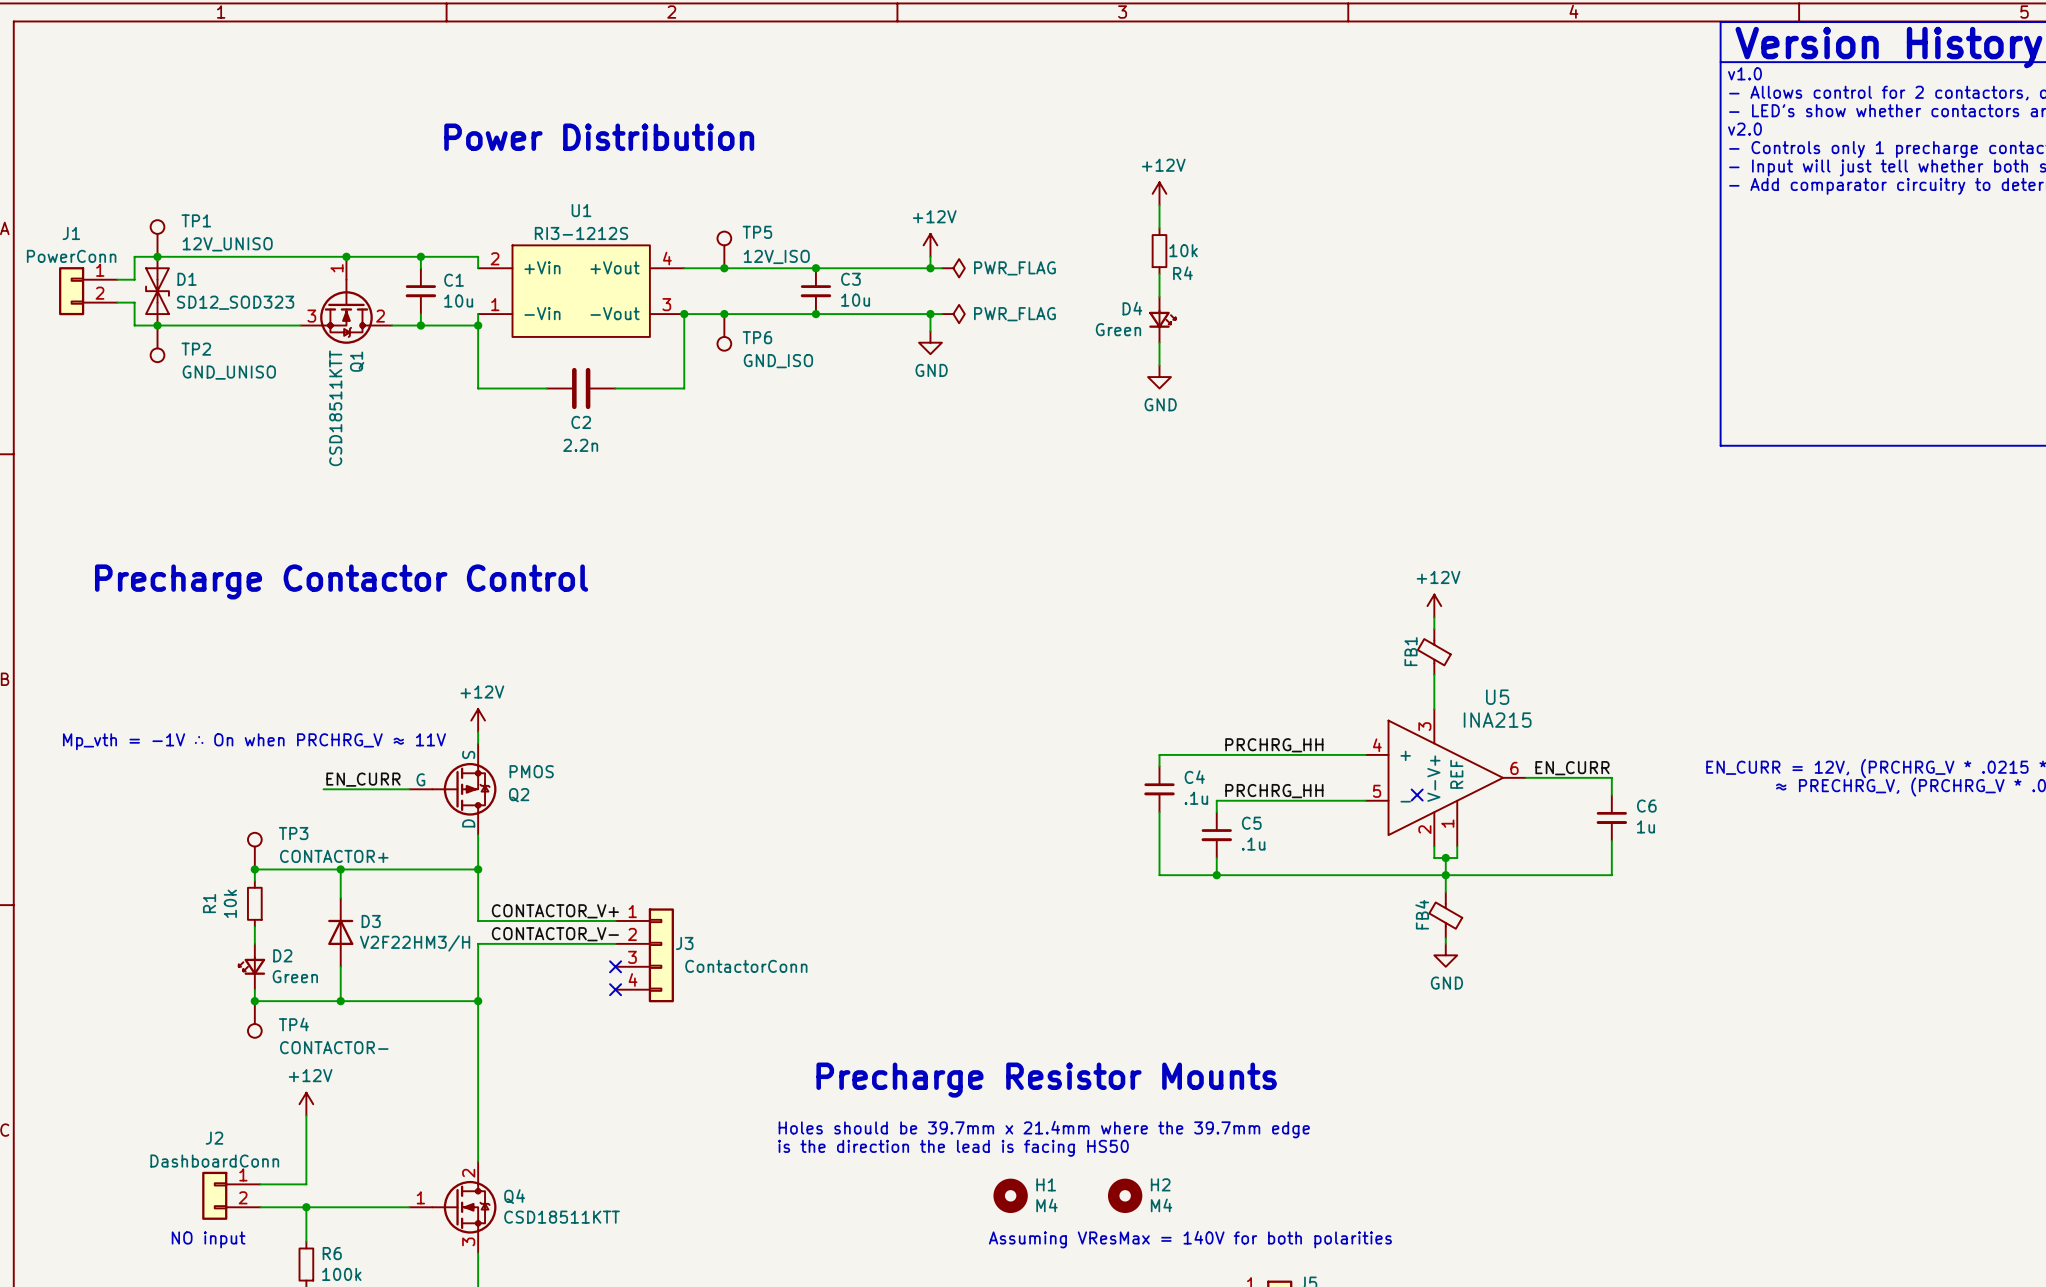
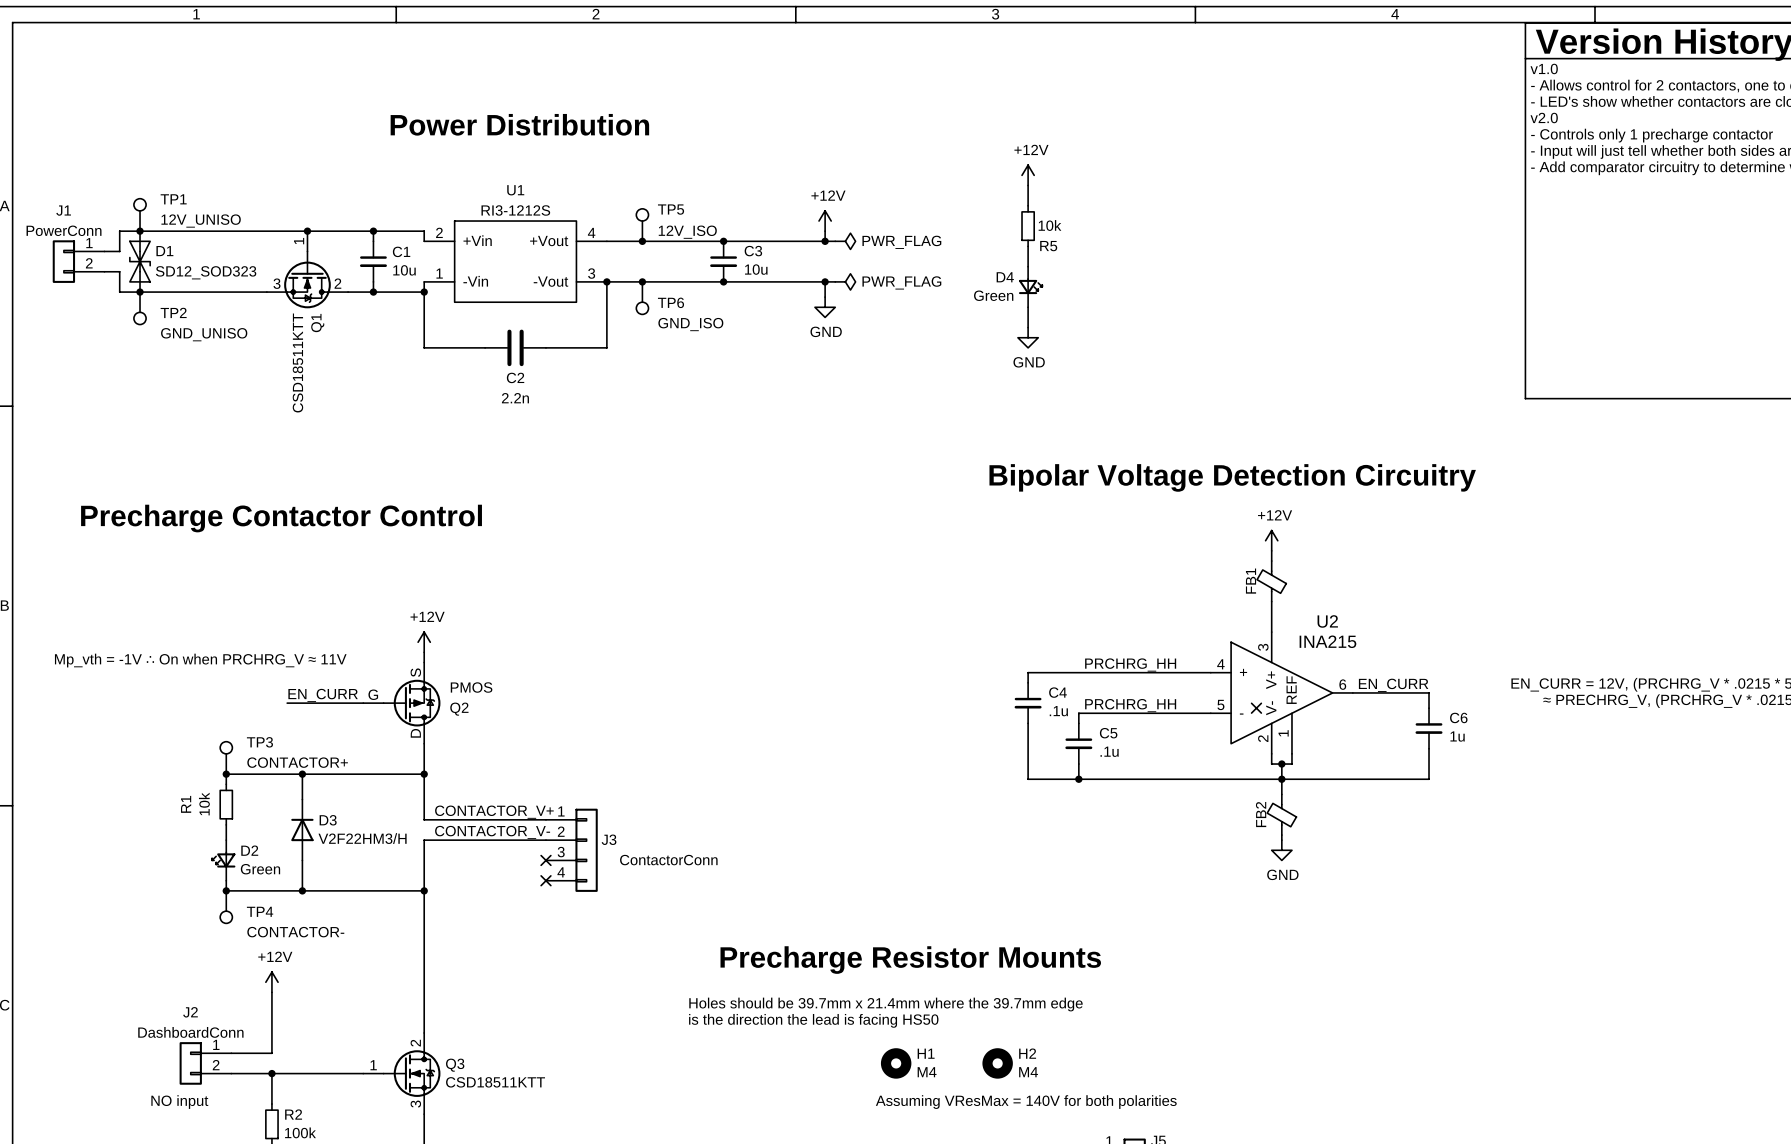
R4 name: R4 (1182, 273) -> R5 (1048, 246)
text: none -> Bipolar Voltage Detection Circuitry (1232, 477)
U5 name: U5 (1497, 697) -> U2 (1327, 621)
FB4 name: FB4 (1422, 914) -> FB2 (1261, 814)
Q4 name: Q4 (514, 1196) -> Q3 (455, 1065)
R6 name: R6 (332, 1253) -> R2 (293, 1114)

